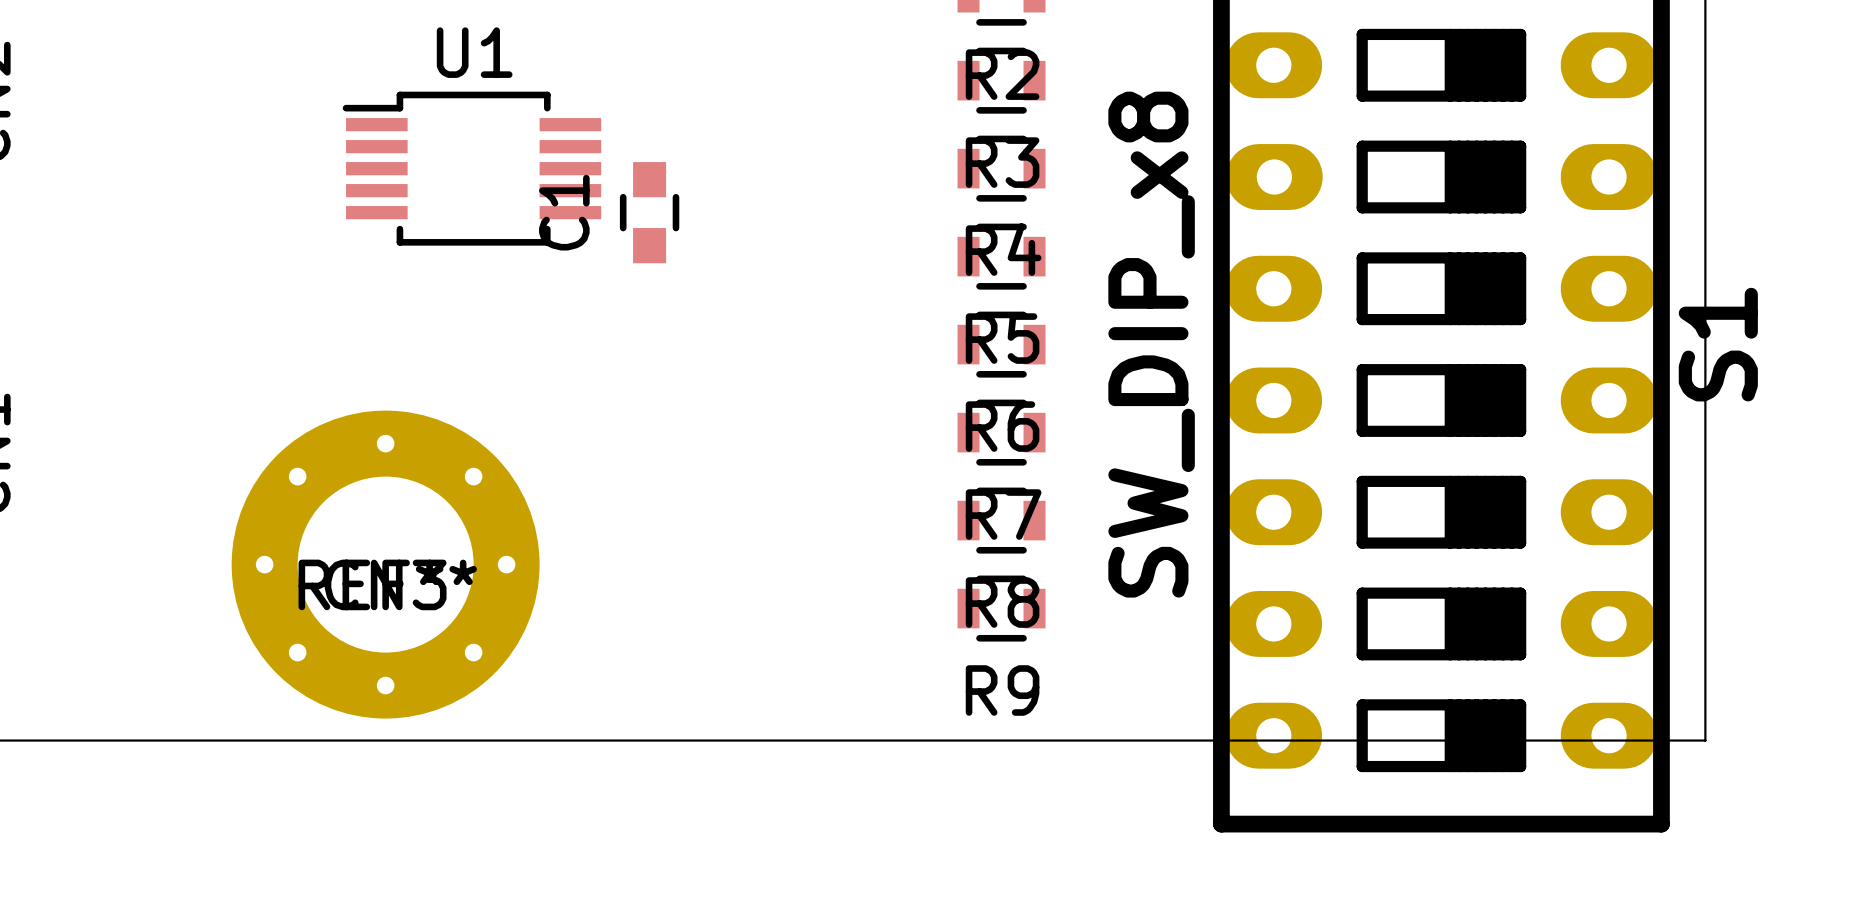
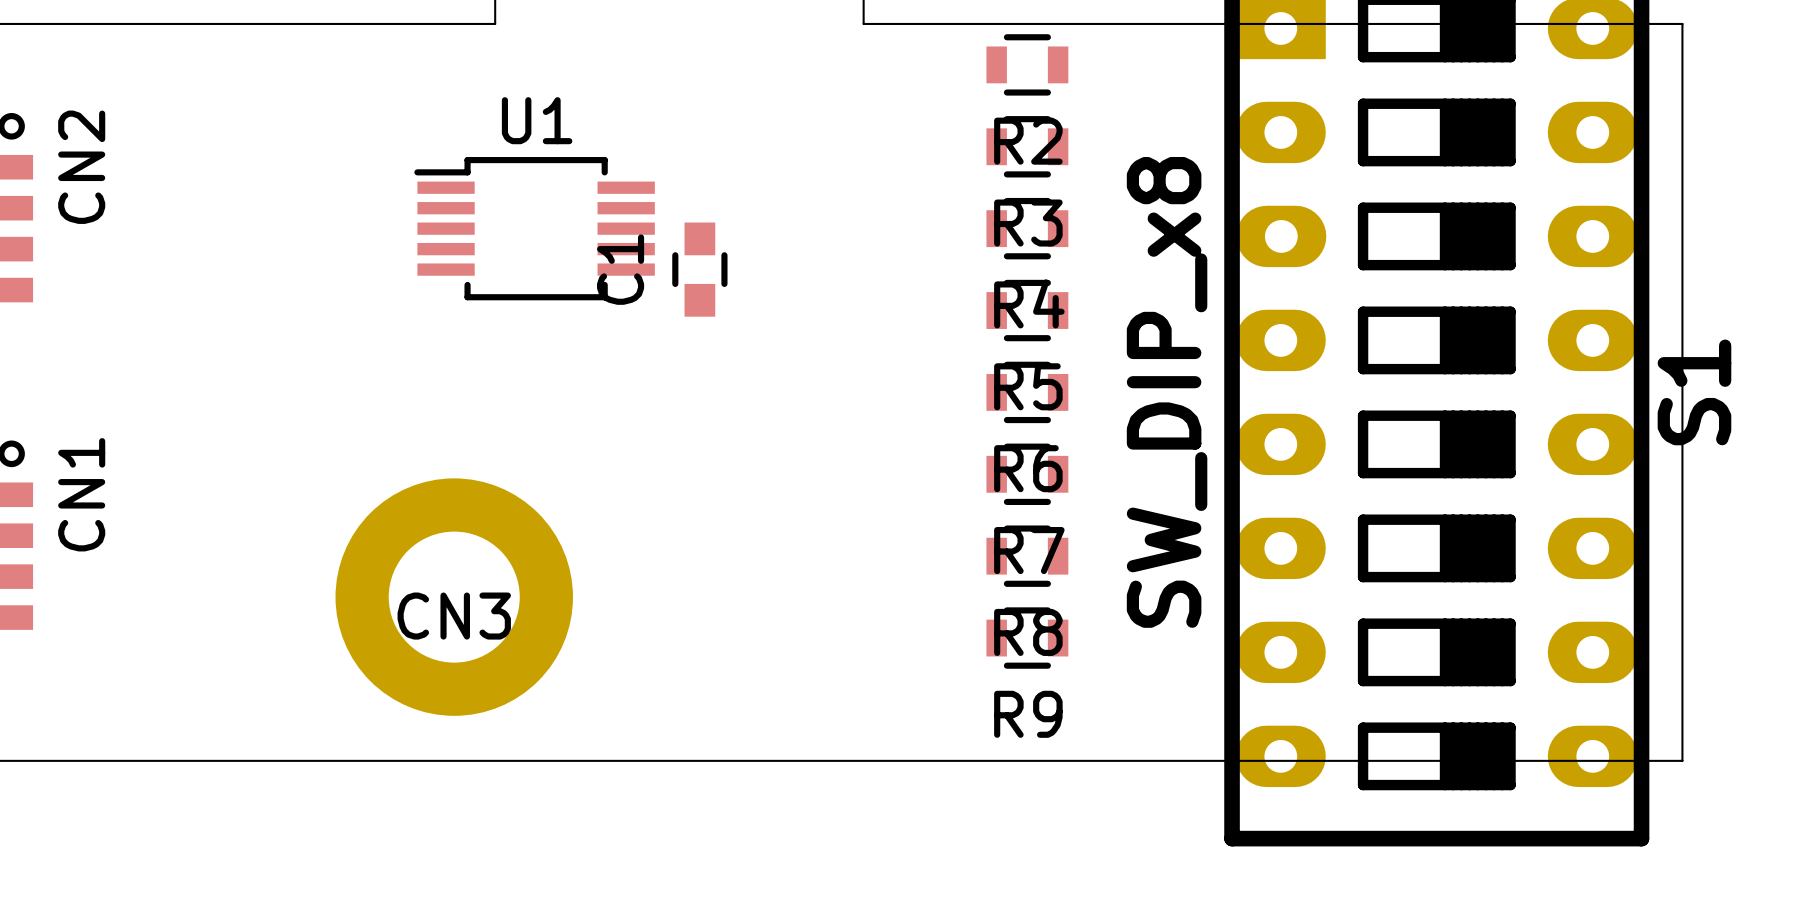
CN3 footprint: [231, 410, 540, 719] -> [335, 478, 573, 716]

